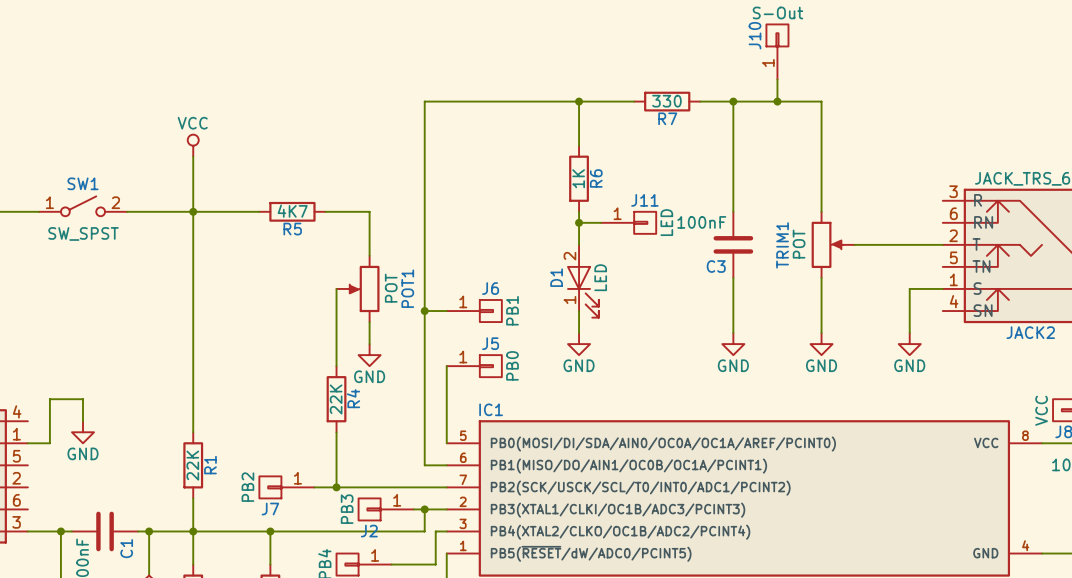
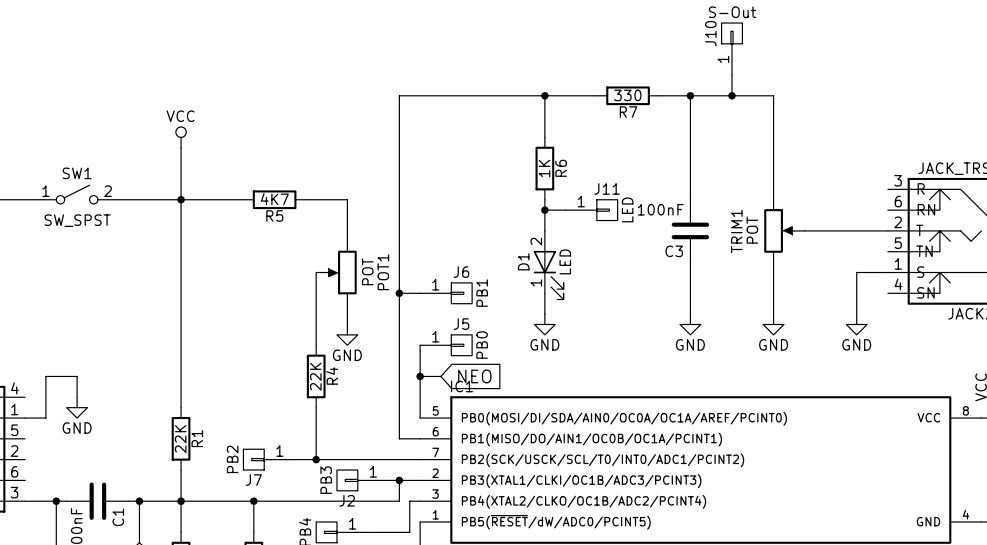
wire: none -> (420, 376) (440, 376)
junction: none -> (420, 376)
global label: none -> NEO (474, 376)

